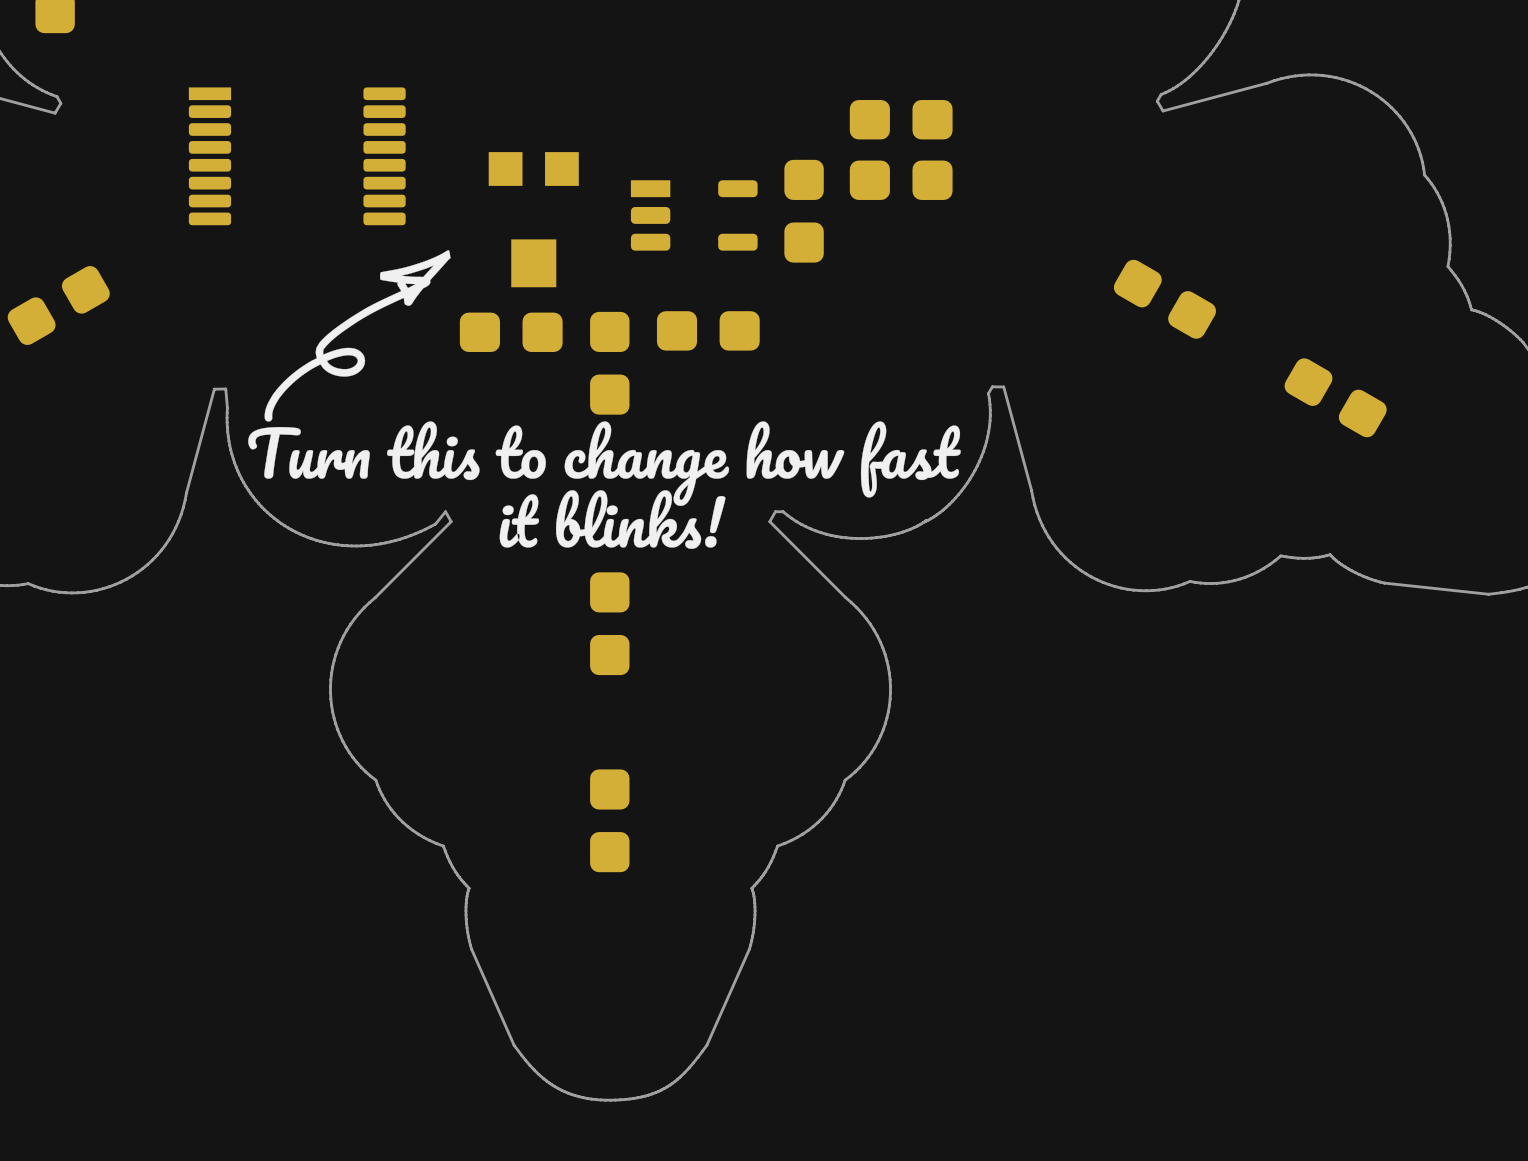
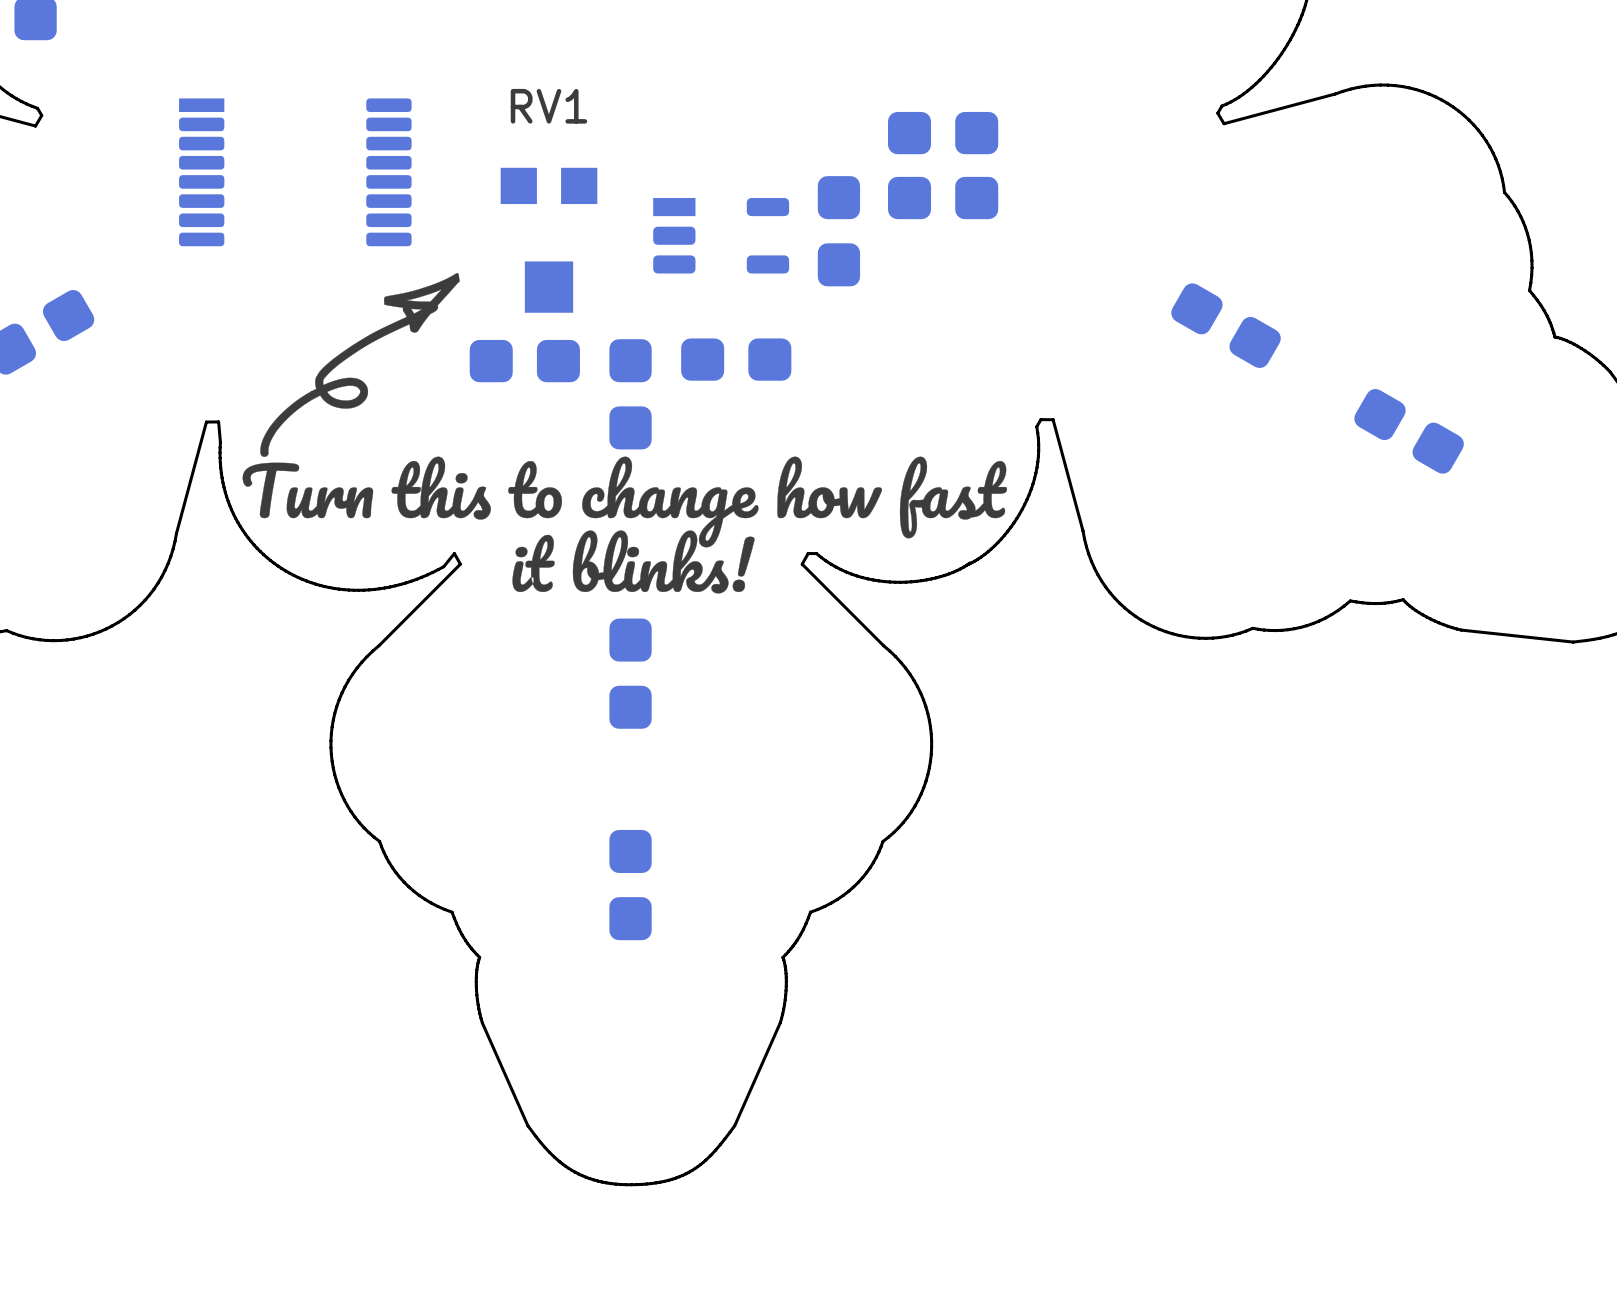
RV1 name: none -> RV1 (548, 106)

